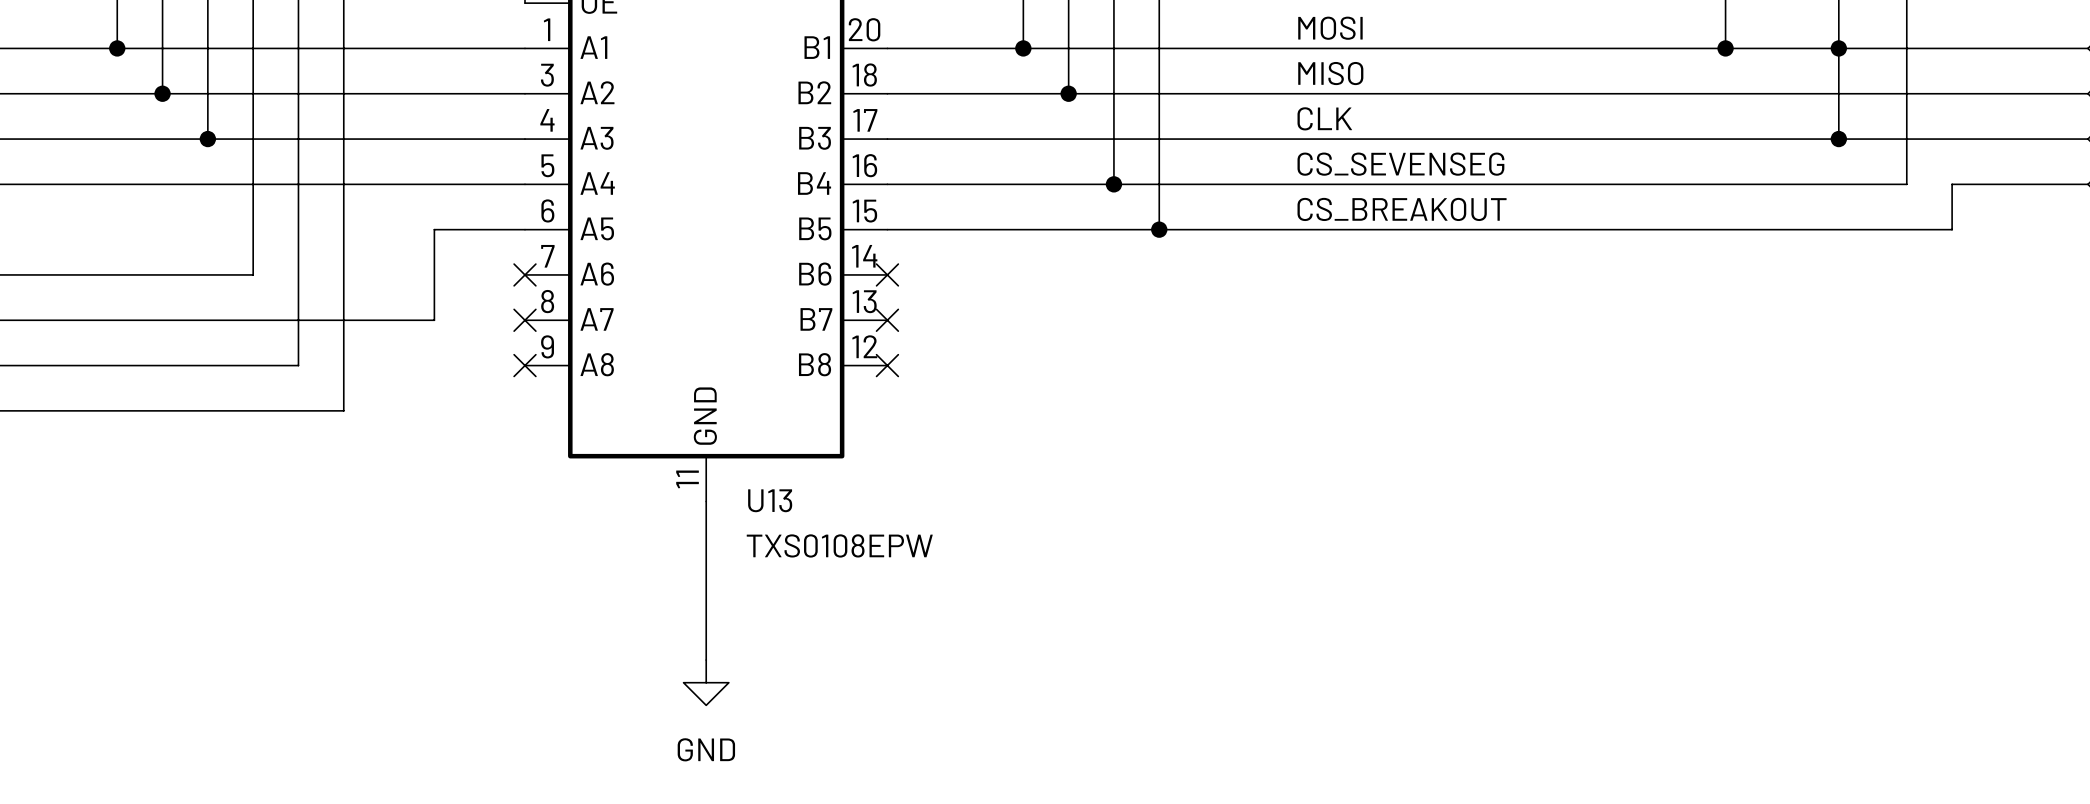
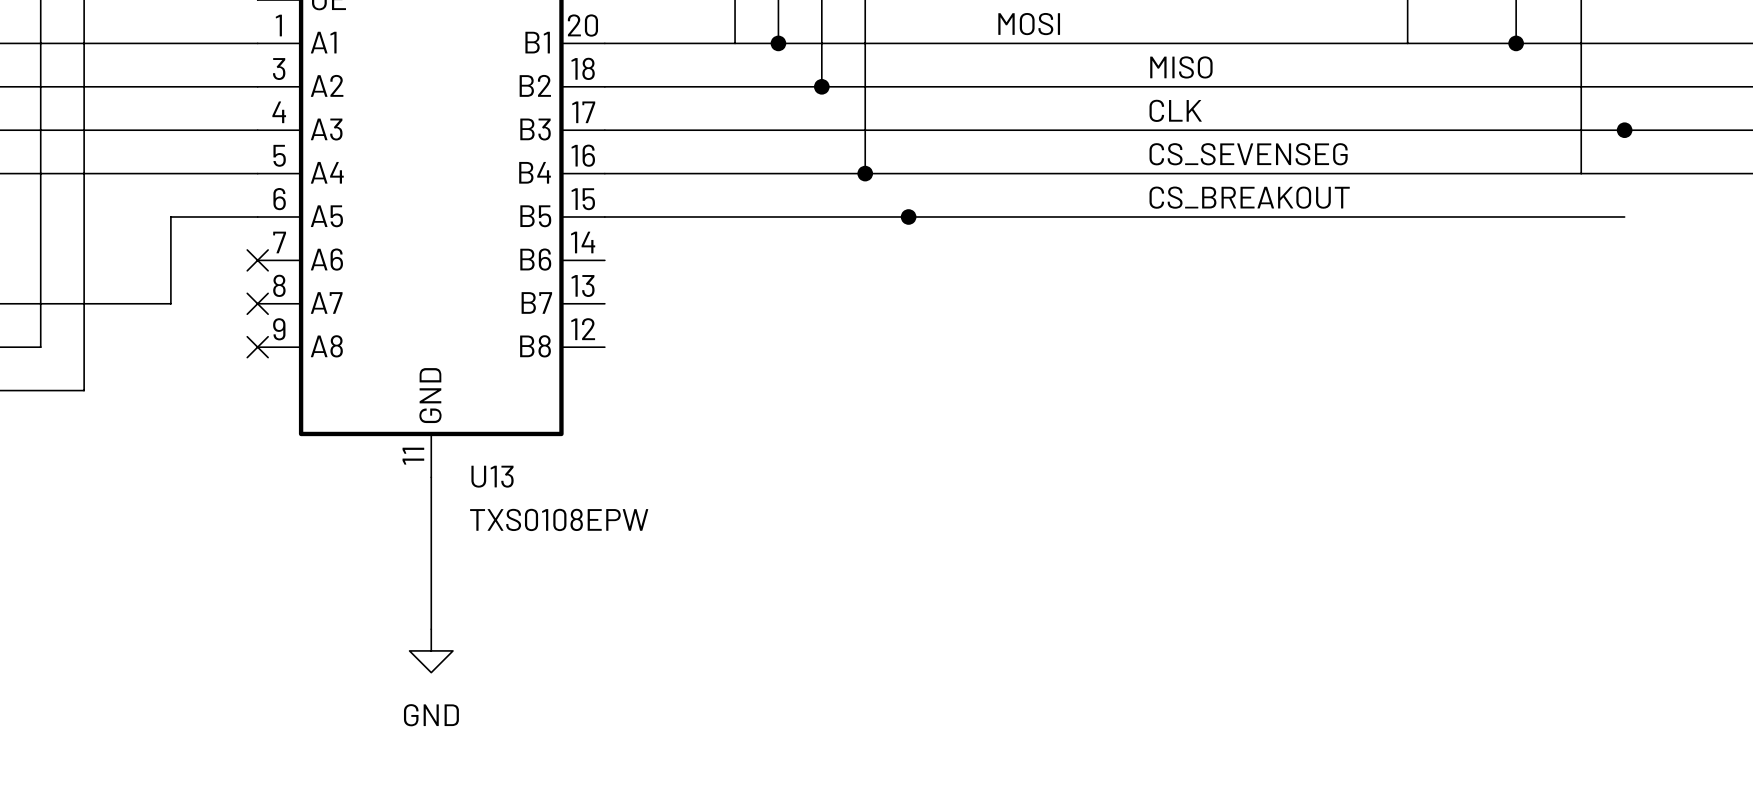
junction: (1023, 48) -> none
wire: (1068, 48) (1068, 93) -> none
junction: none -> (778, 43)
junction: (1725, 48) -> none
wire: (1838, 48) (1838, 139) -> none
label position: MISO (1330, 73) -> MISO (1181, 67)
junction: (1068, 93) -> none
wire: (1113, 93) (1113, 184) -> none
junction: none -> (821, 86)
label position: CLK (1324, 118) -> CLK (1175, 110)
junction: (1838, 139) -> none
junction: none -> (1624, 130)
label position: CS_SEVENSEG (1400, 164) -> CS_SEVENSEG (1248, 154)
junction: (1113, 184) -> none
wire: (1159, 184) (1159, 229) -> none
junction: none -> (865, 173)
wire: (1952, 184) (1952, 229) -> (1624, 173) (1581, 173)
label position: CS_BREAKOUT (1402, 209) -> CS_BREAKOUT (1249, 197)
junction: (1159, 229) -> none
junction: none -> (908, 216)
no-connect mark: (887, 274) -> none
no-connect mark: (887, 320) -> none
no-connect mark: (887, 365) -> none

